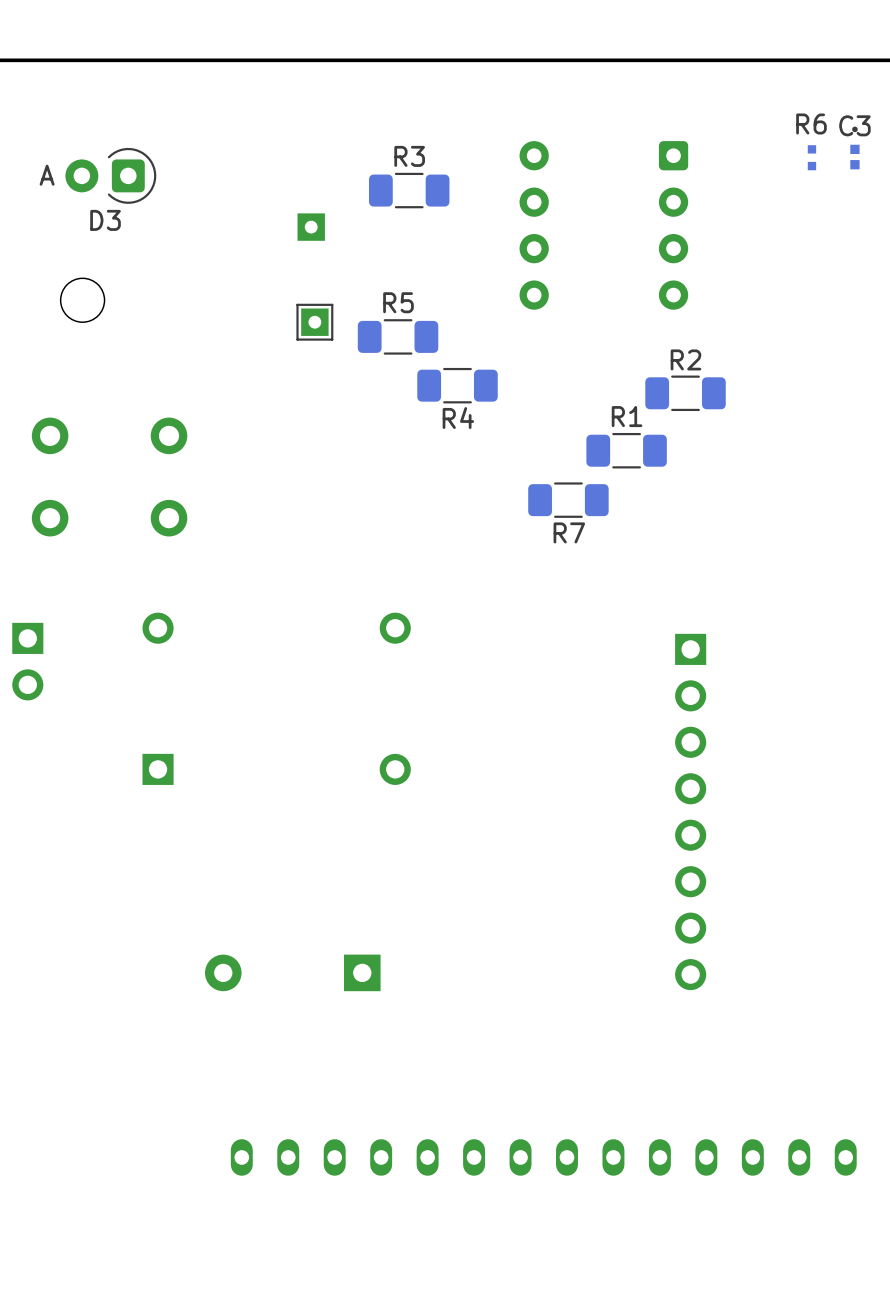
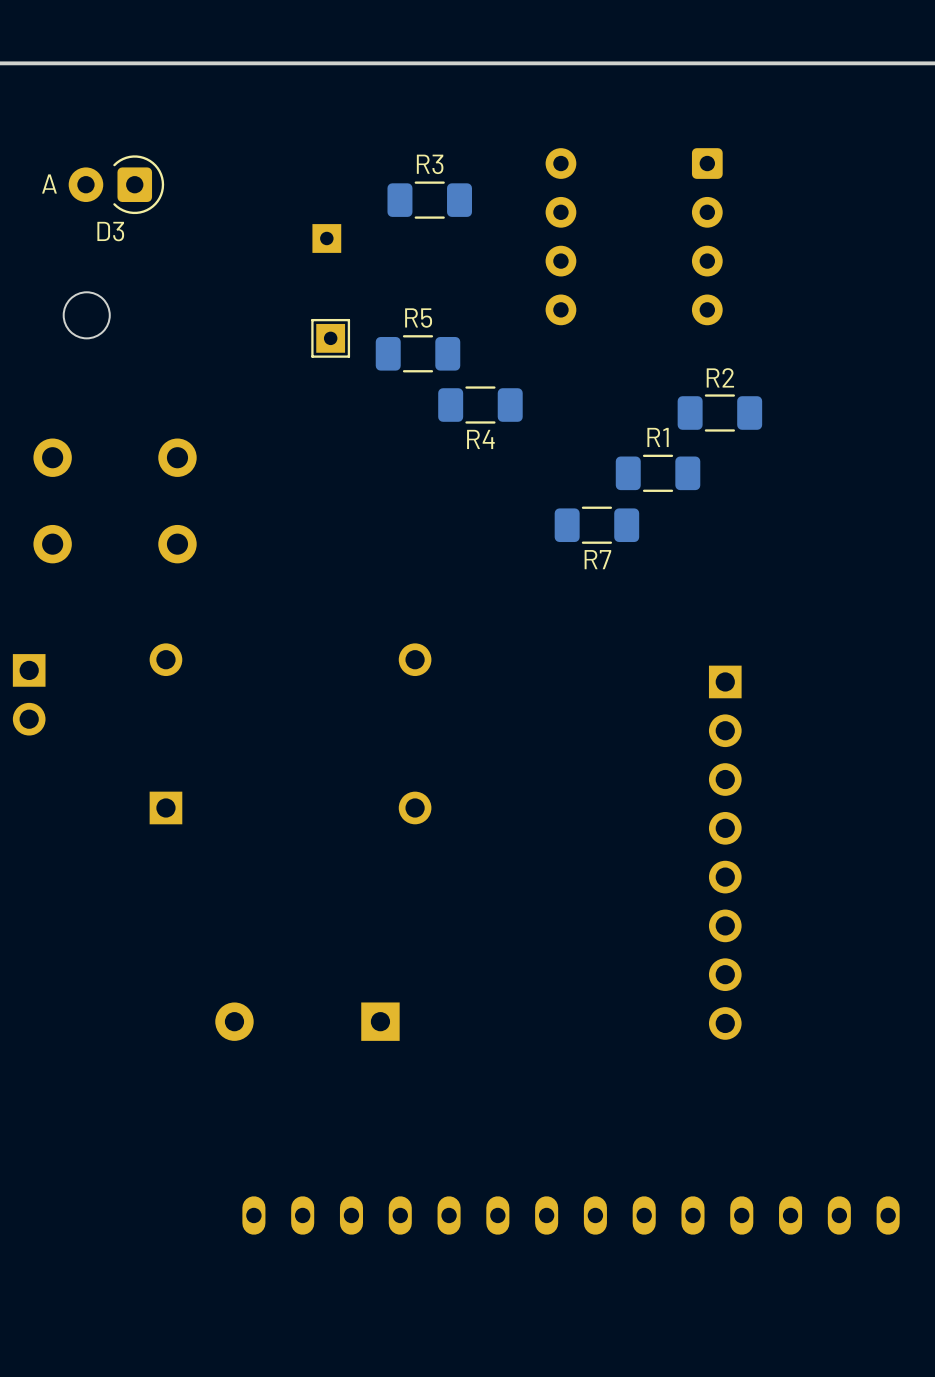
C3: (854, 147) -> none
R6: (811, 157) -> none

